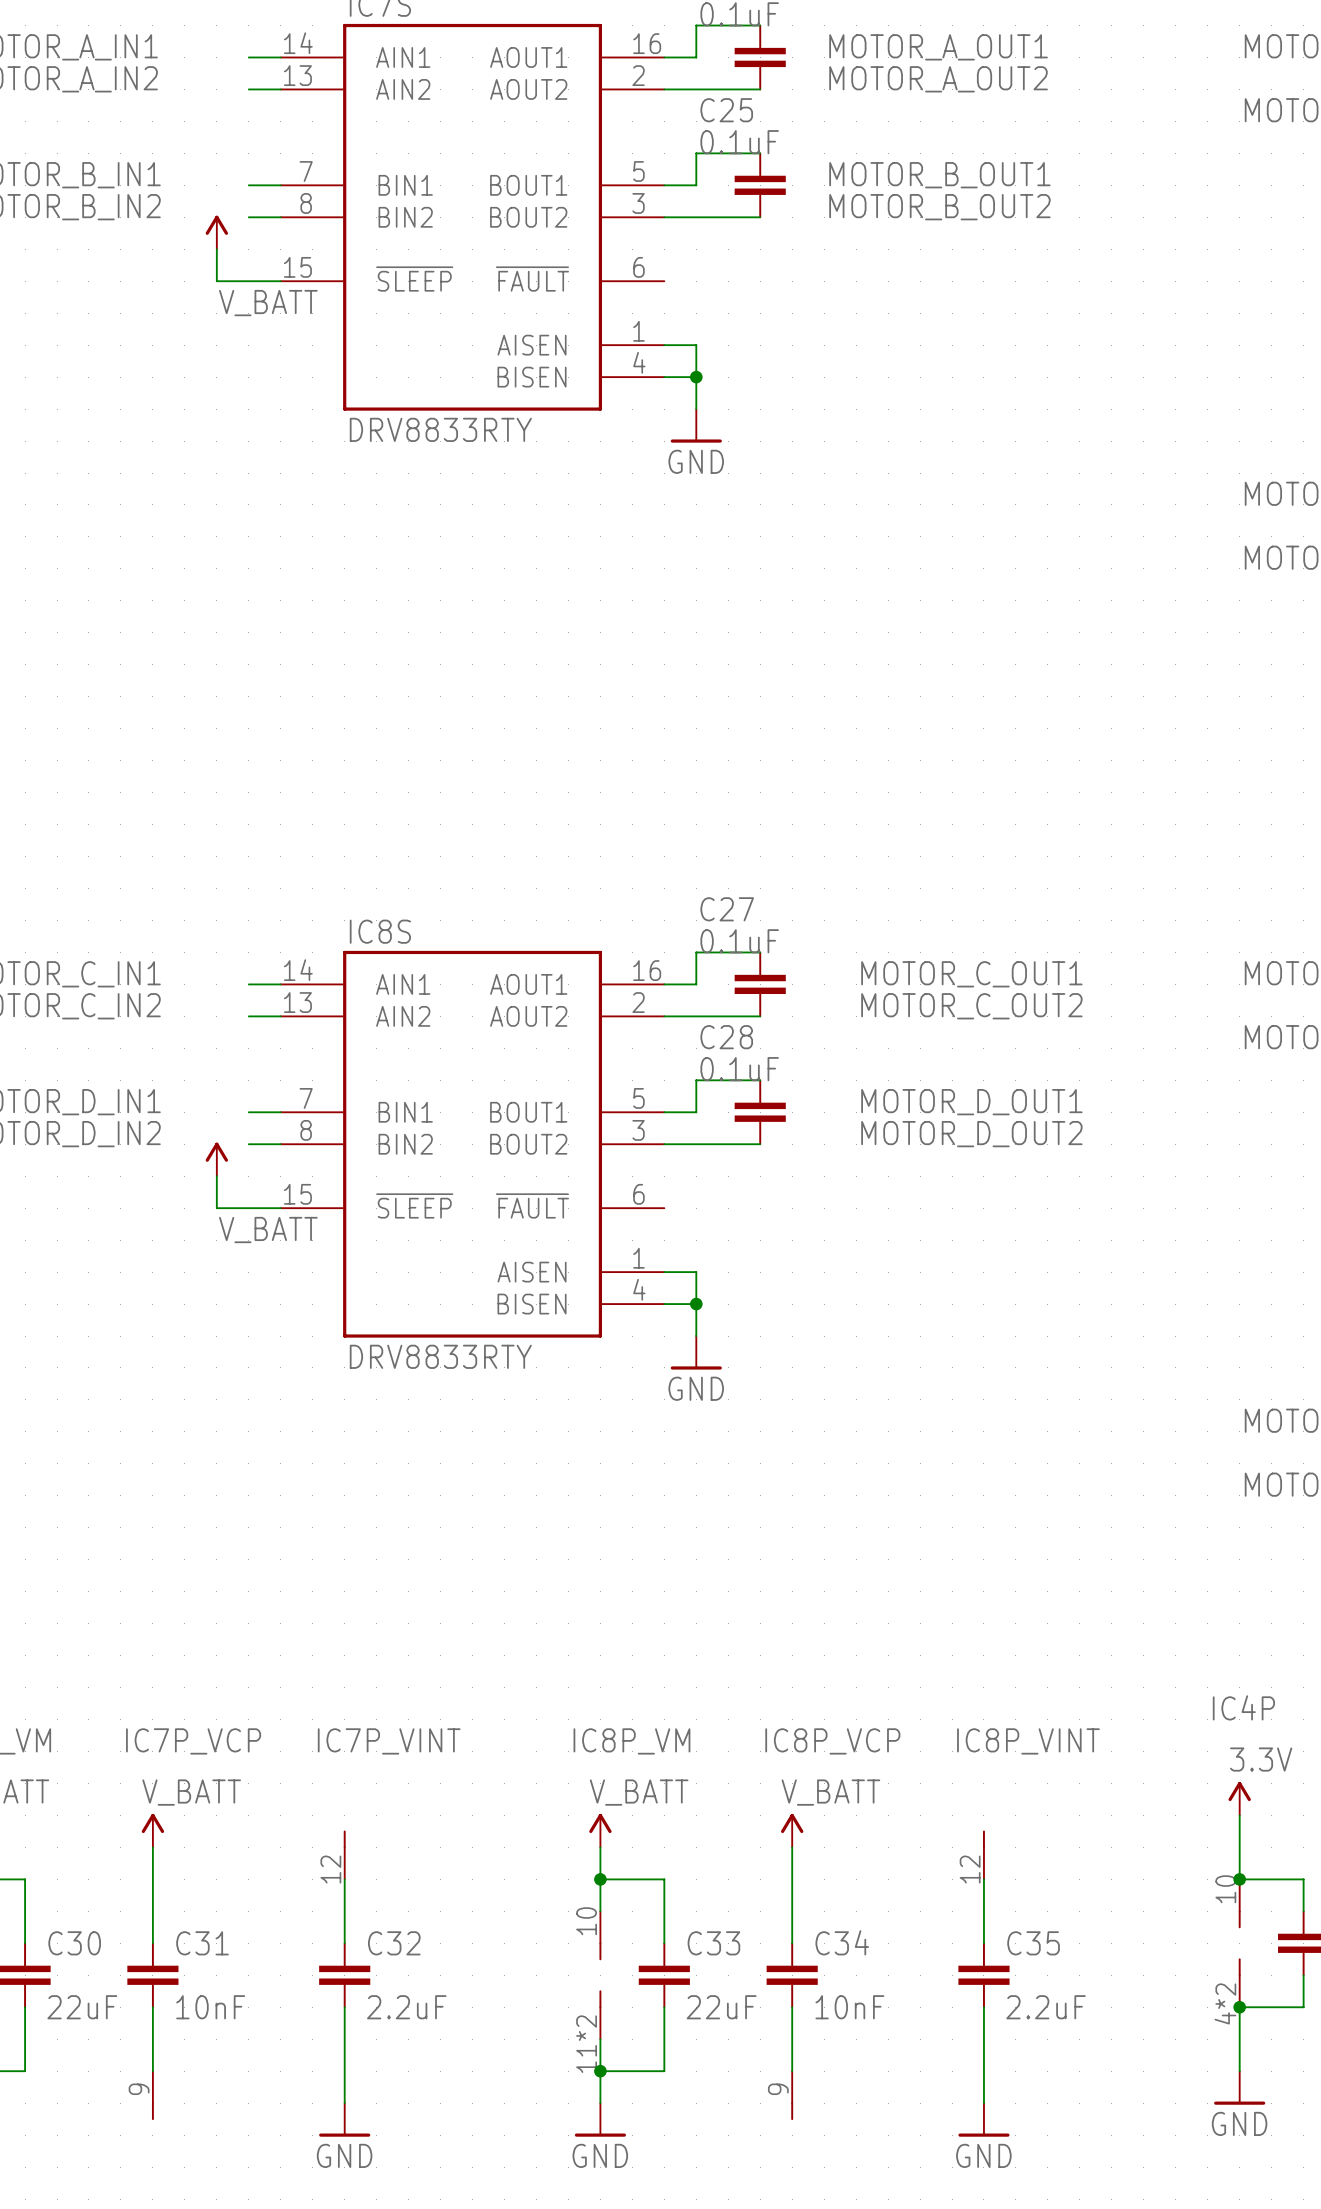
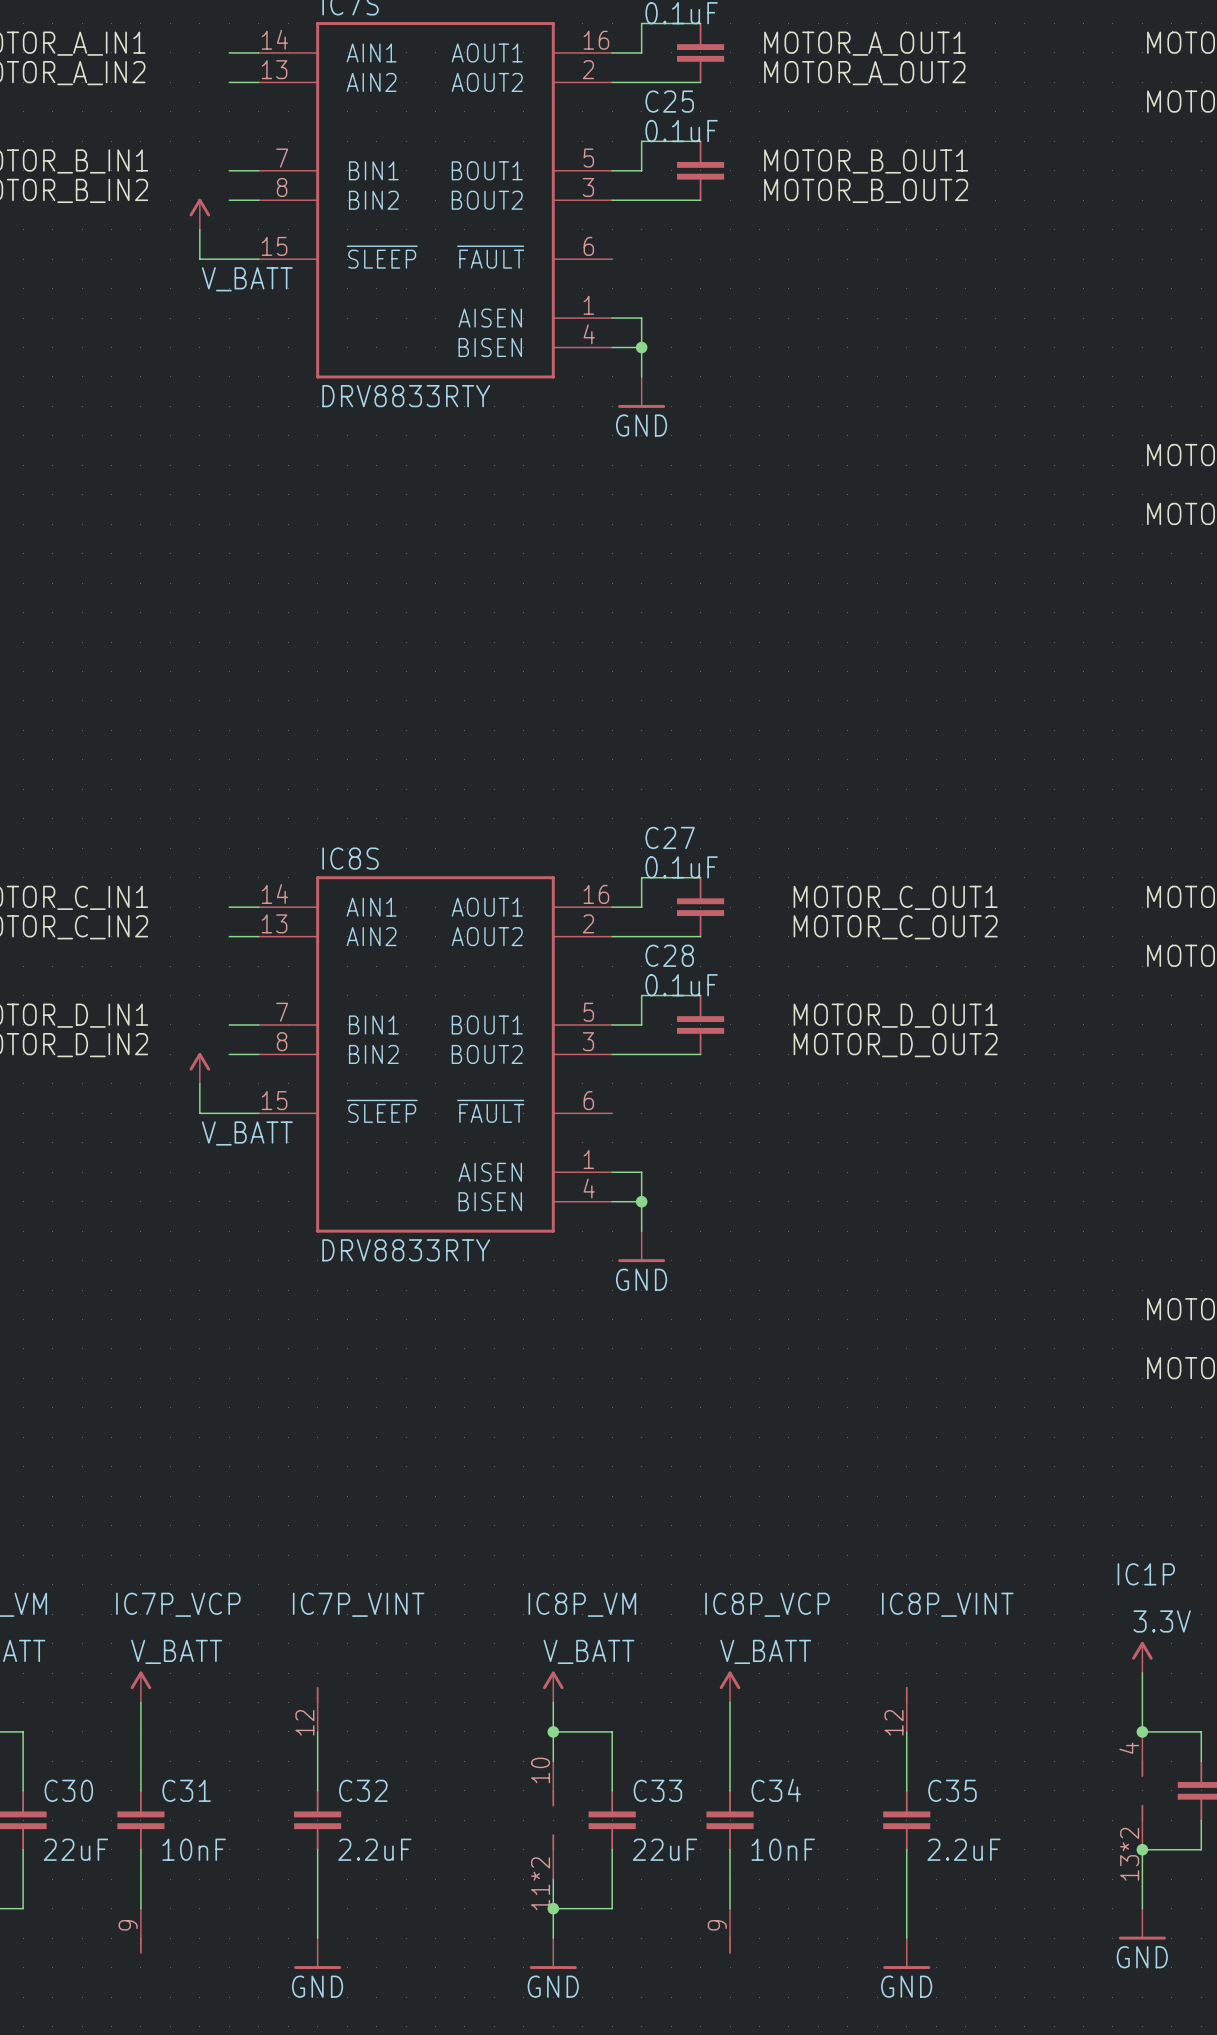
IC4P name: IC4P (1243, 1707) -> IC1P (1146, 1574)
IC4P pin number: 10 (1225, 1889) -> 4 (1129, 1748)
IC4P pin number: 4*2 (1225, 2003) -> 13*2 (1129, 1854)

